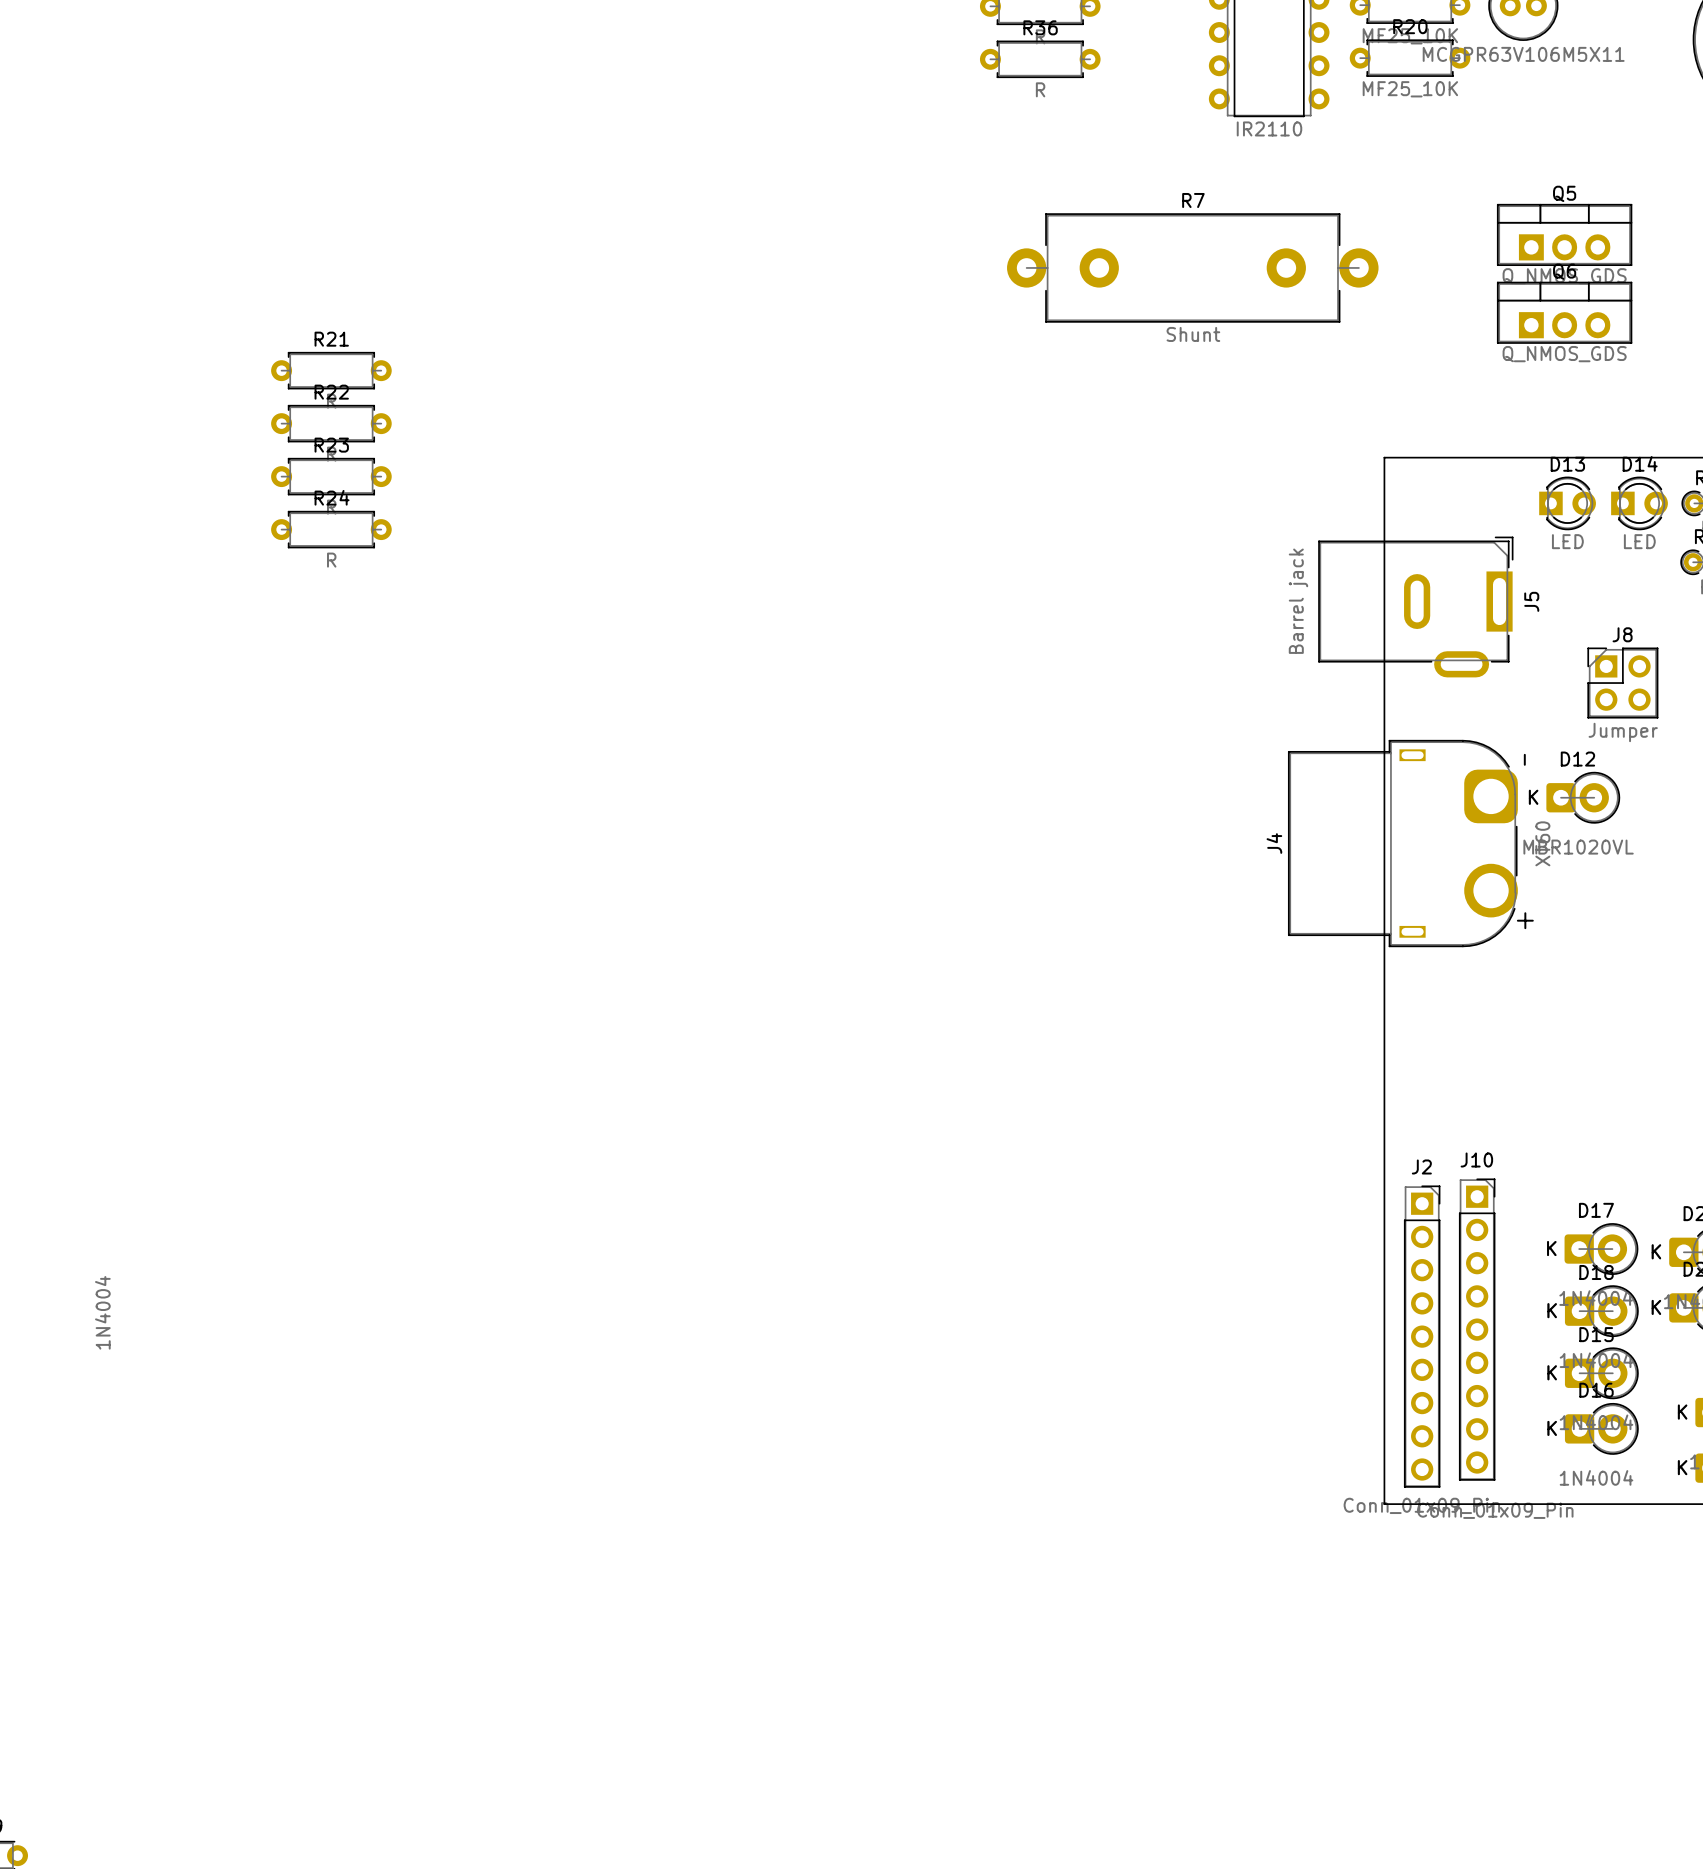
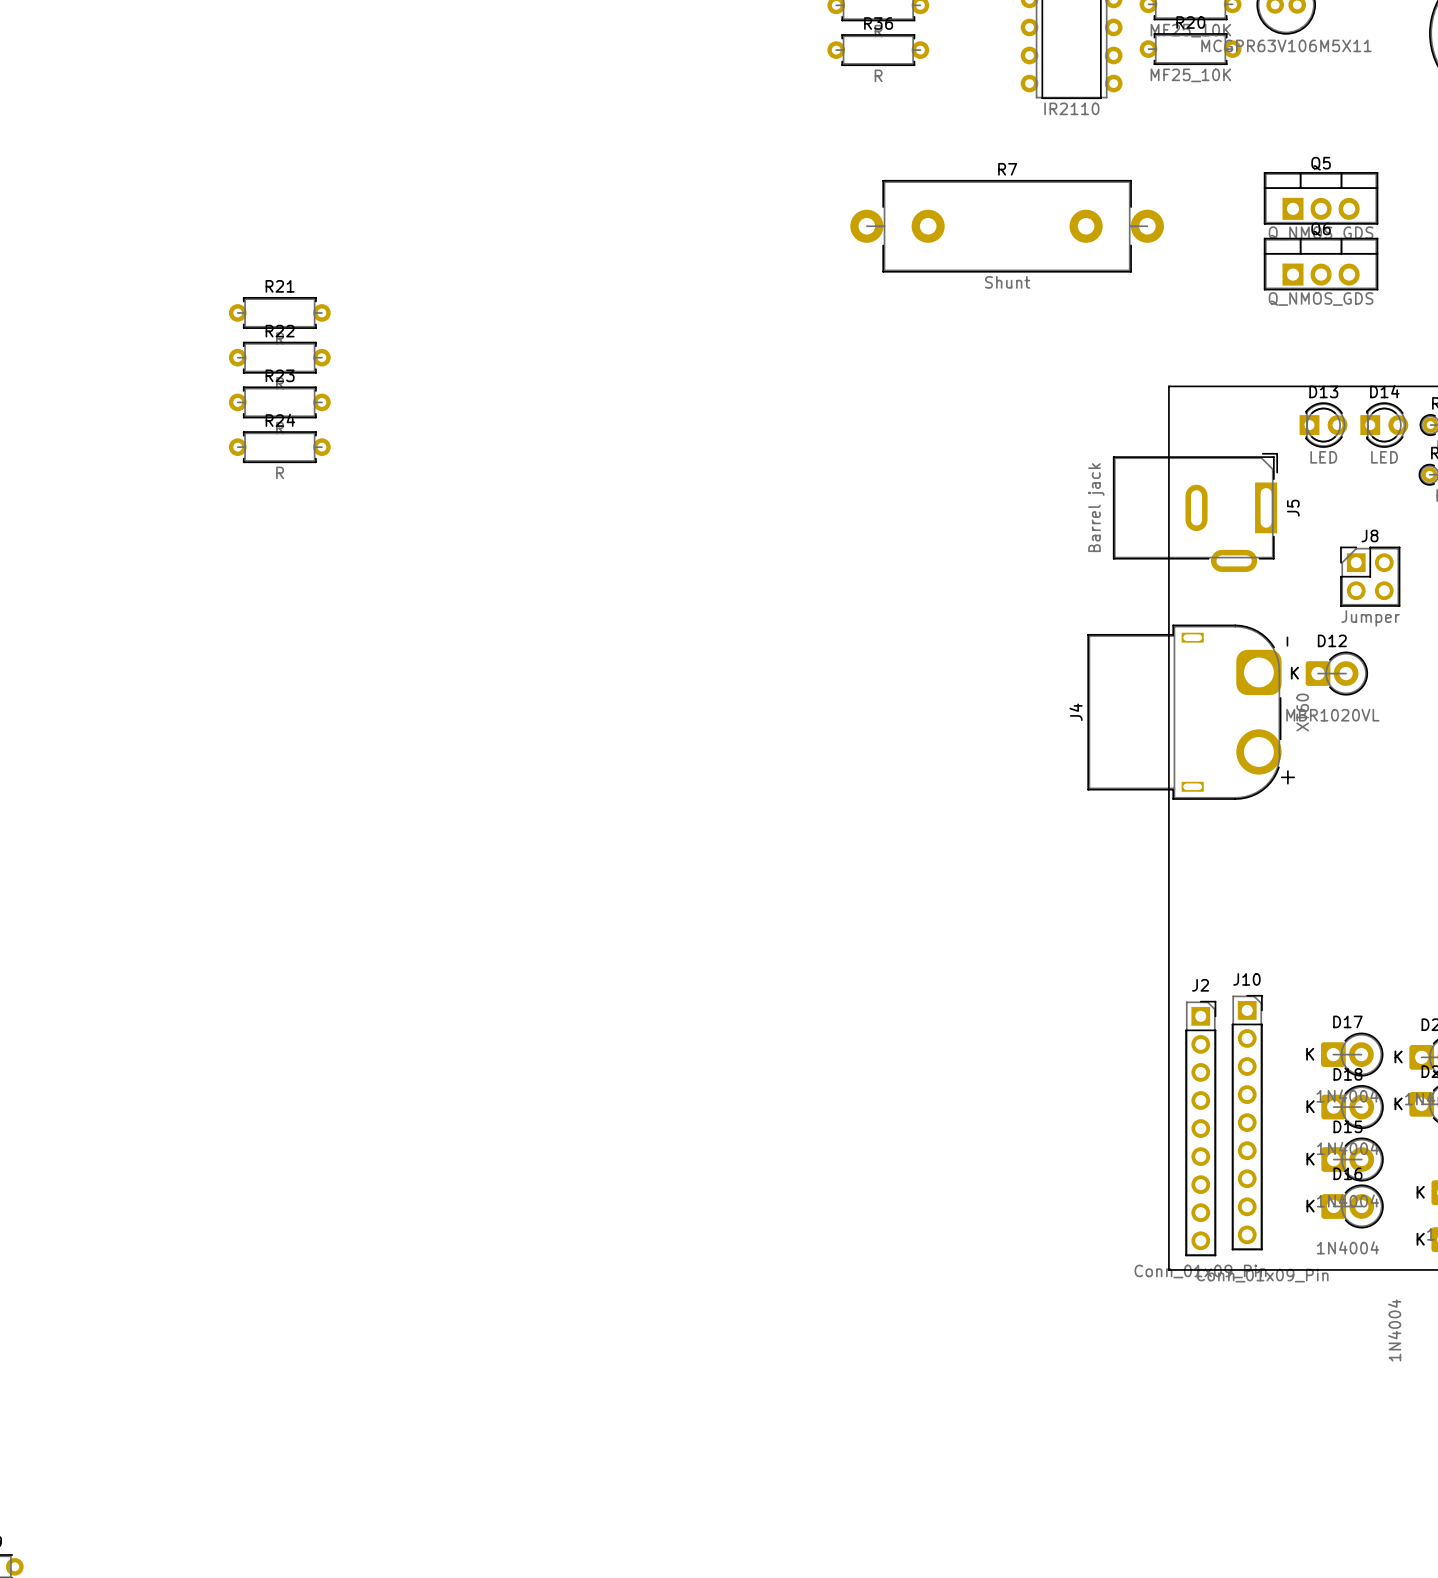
part value position: 1N4004 (102, 1312) -> 1N4004 (1394, 1330)

